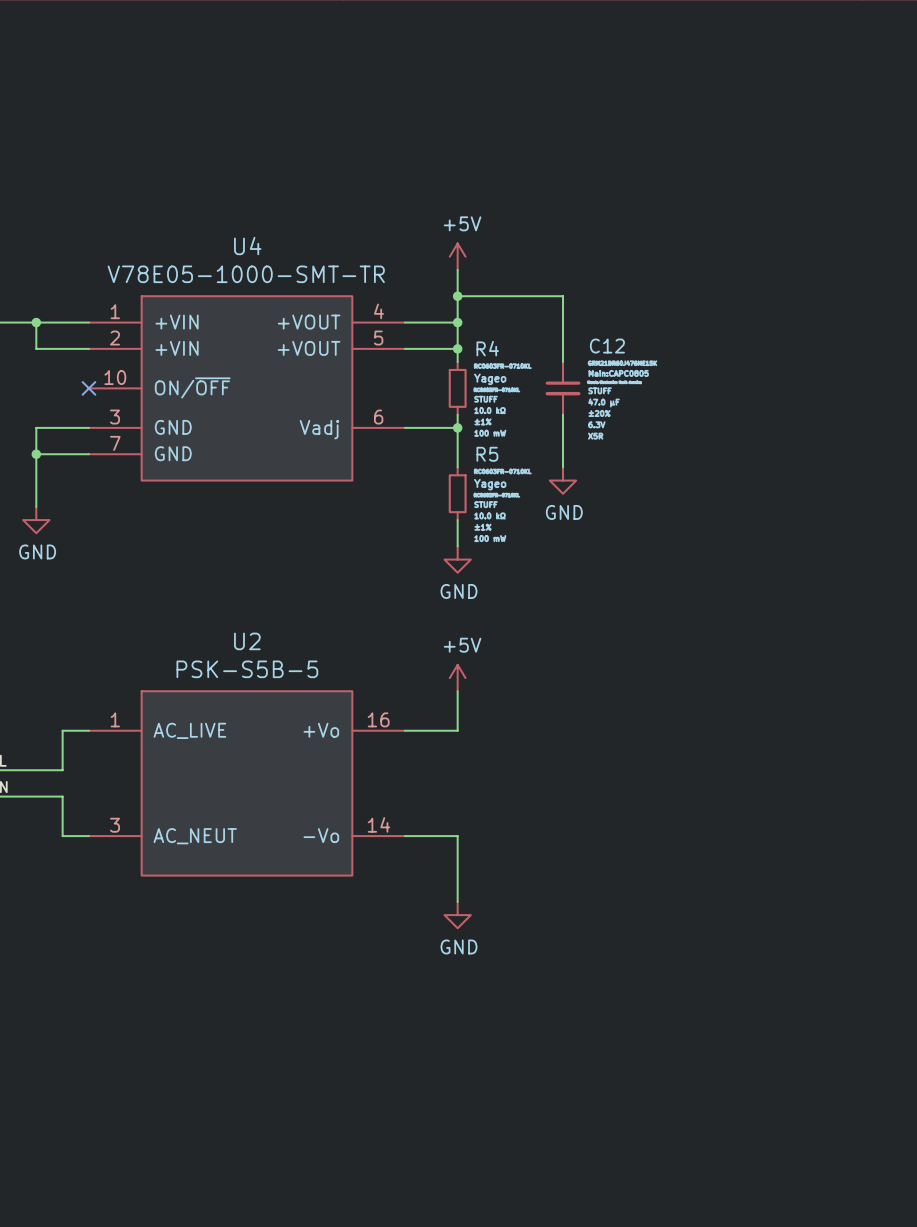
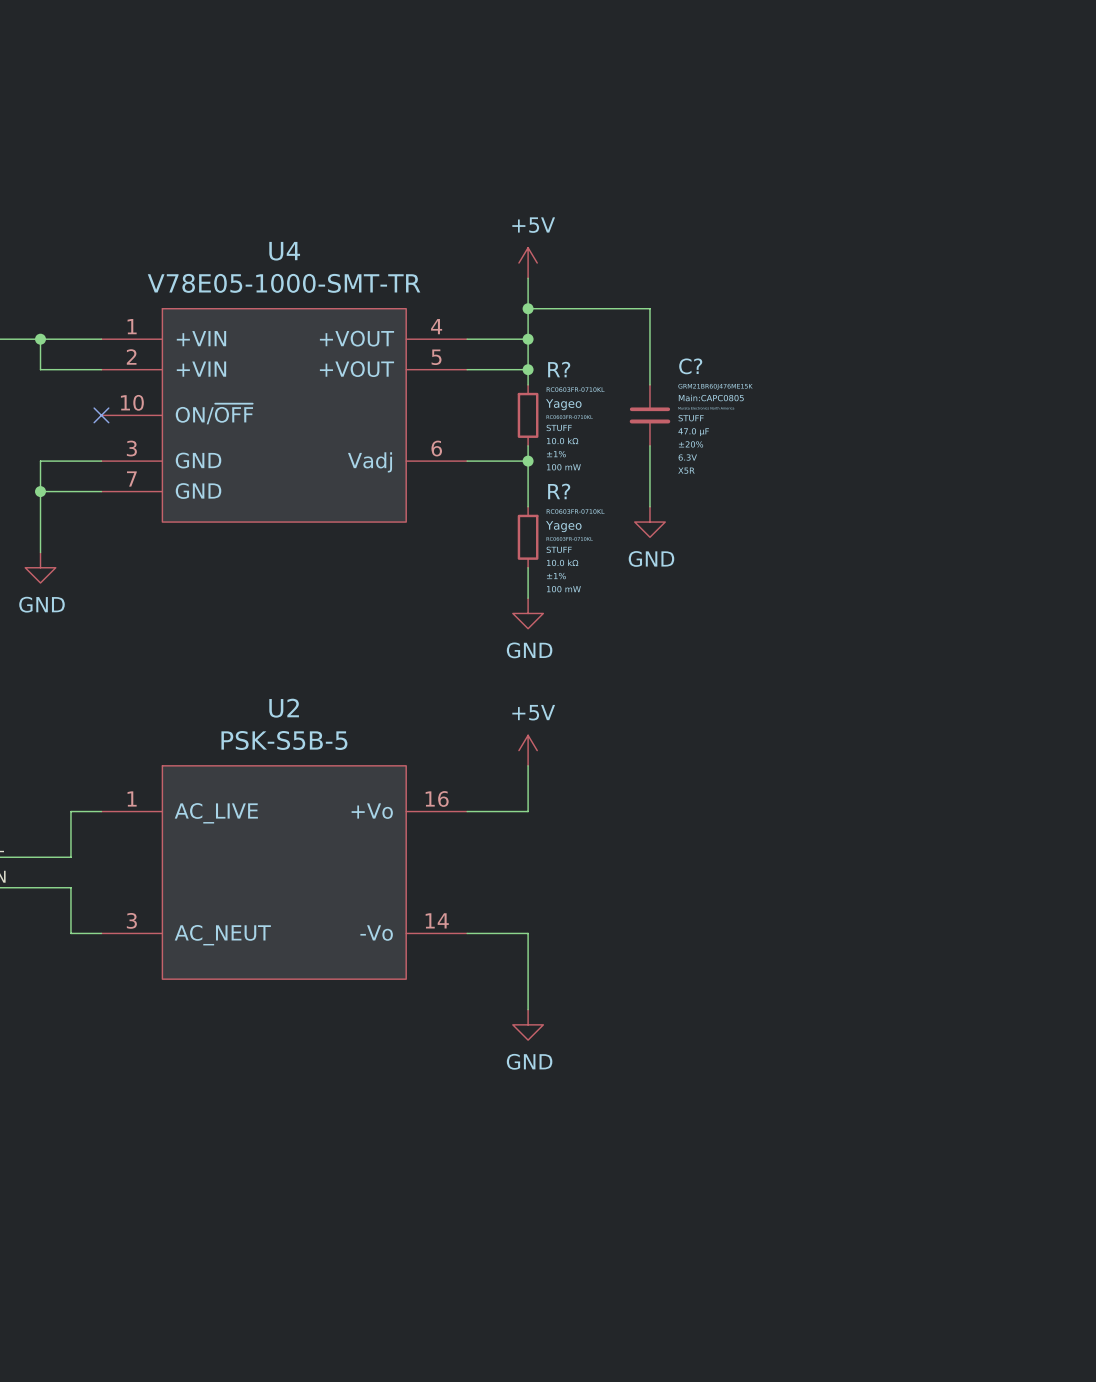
C12 name: C12 (607, 346) -> C? (690, 366)
R4 name: R4 (487, 348) -> R? (559, 369)
R5 name: R5 (487, 454) -> R? (559, 491)

